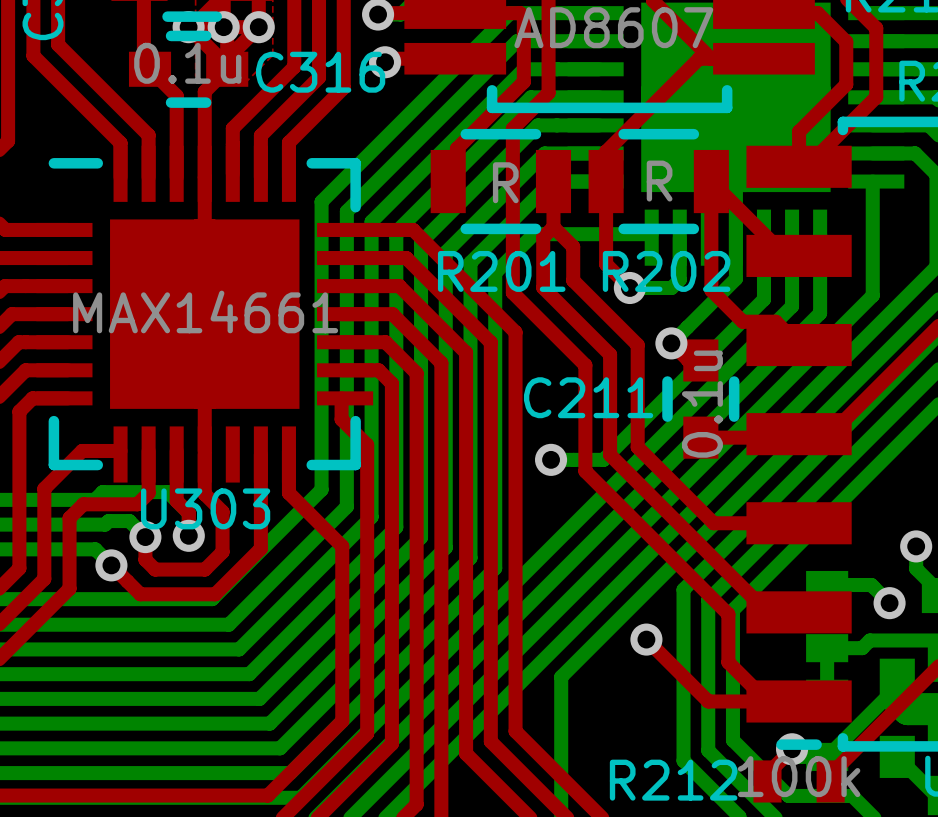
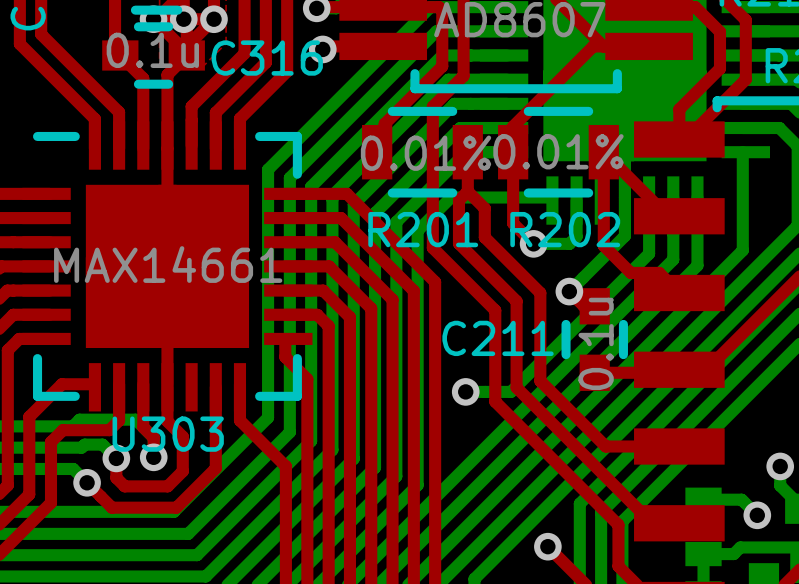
R202 value: R (659, 181) -> 0.01% (558, 151)
R201 value: R (505, 182) -> 0.01% (426, 153)

